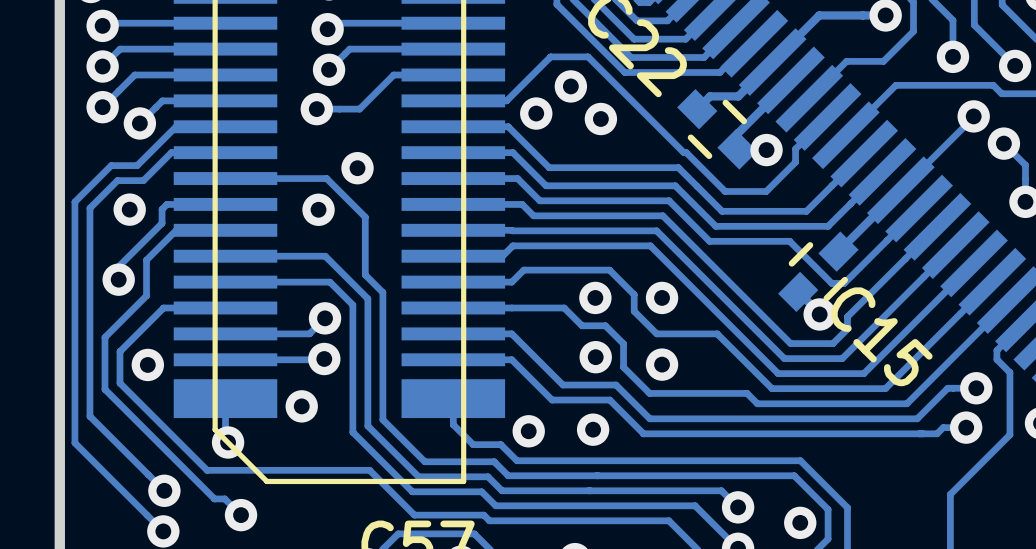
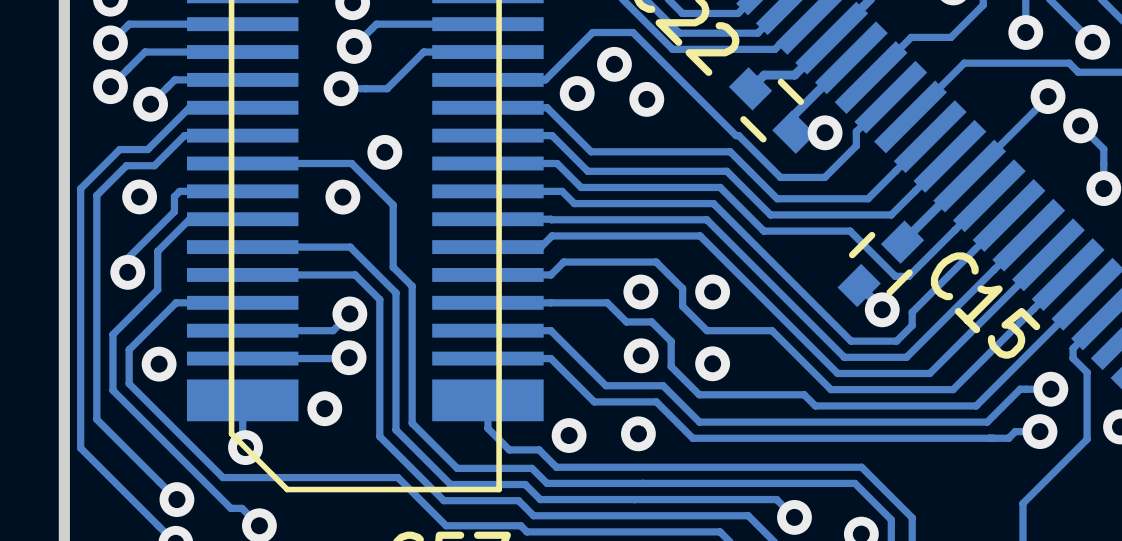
C15 name position: C15 (881, 336) -> C15 (985, 305)

